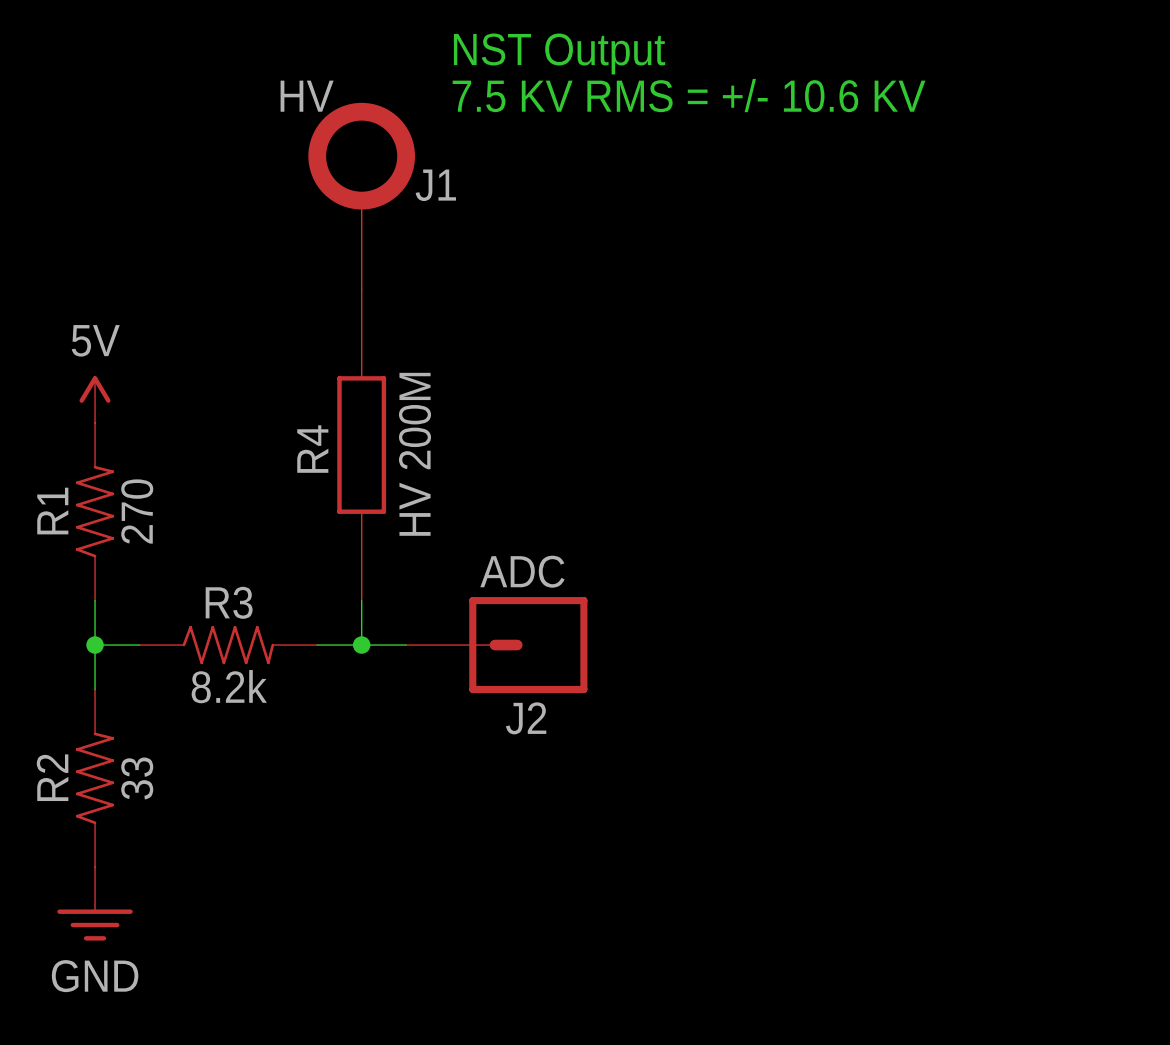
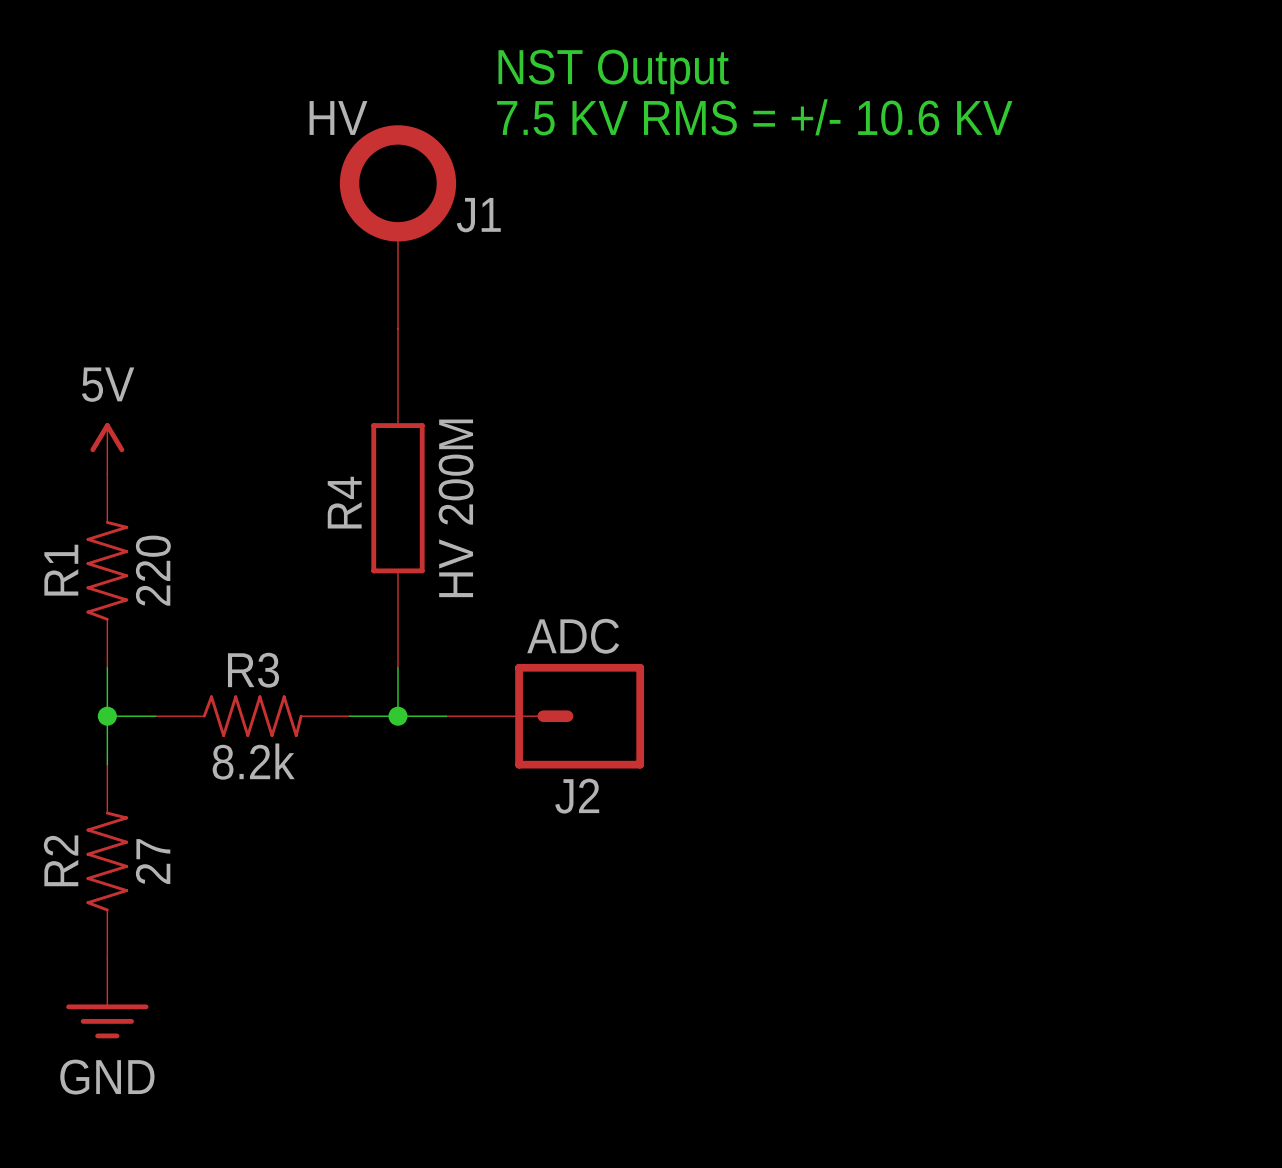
R1 value: 270 (137, 511) -> 220 (153, 570)
R2 value: 33 (137, 778) -> 27 (153, 861)

